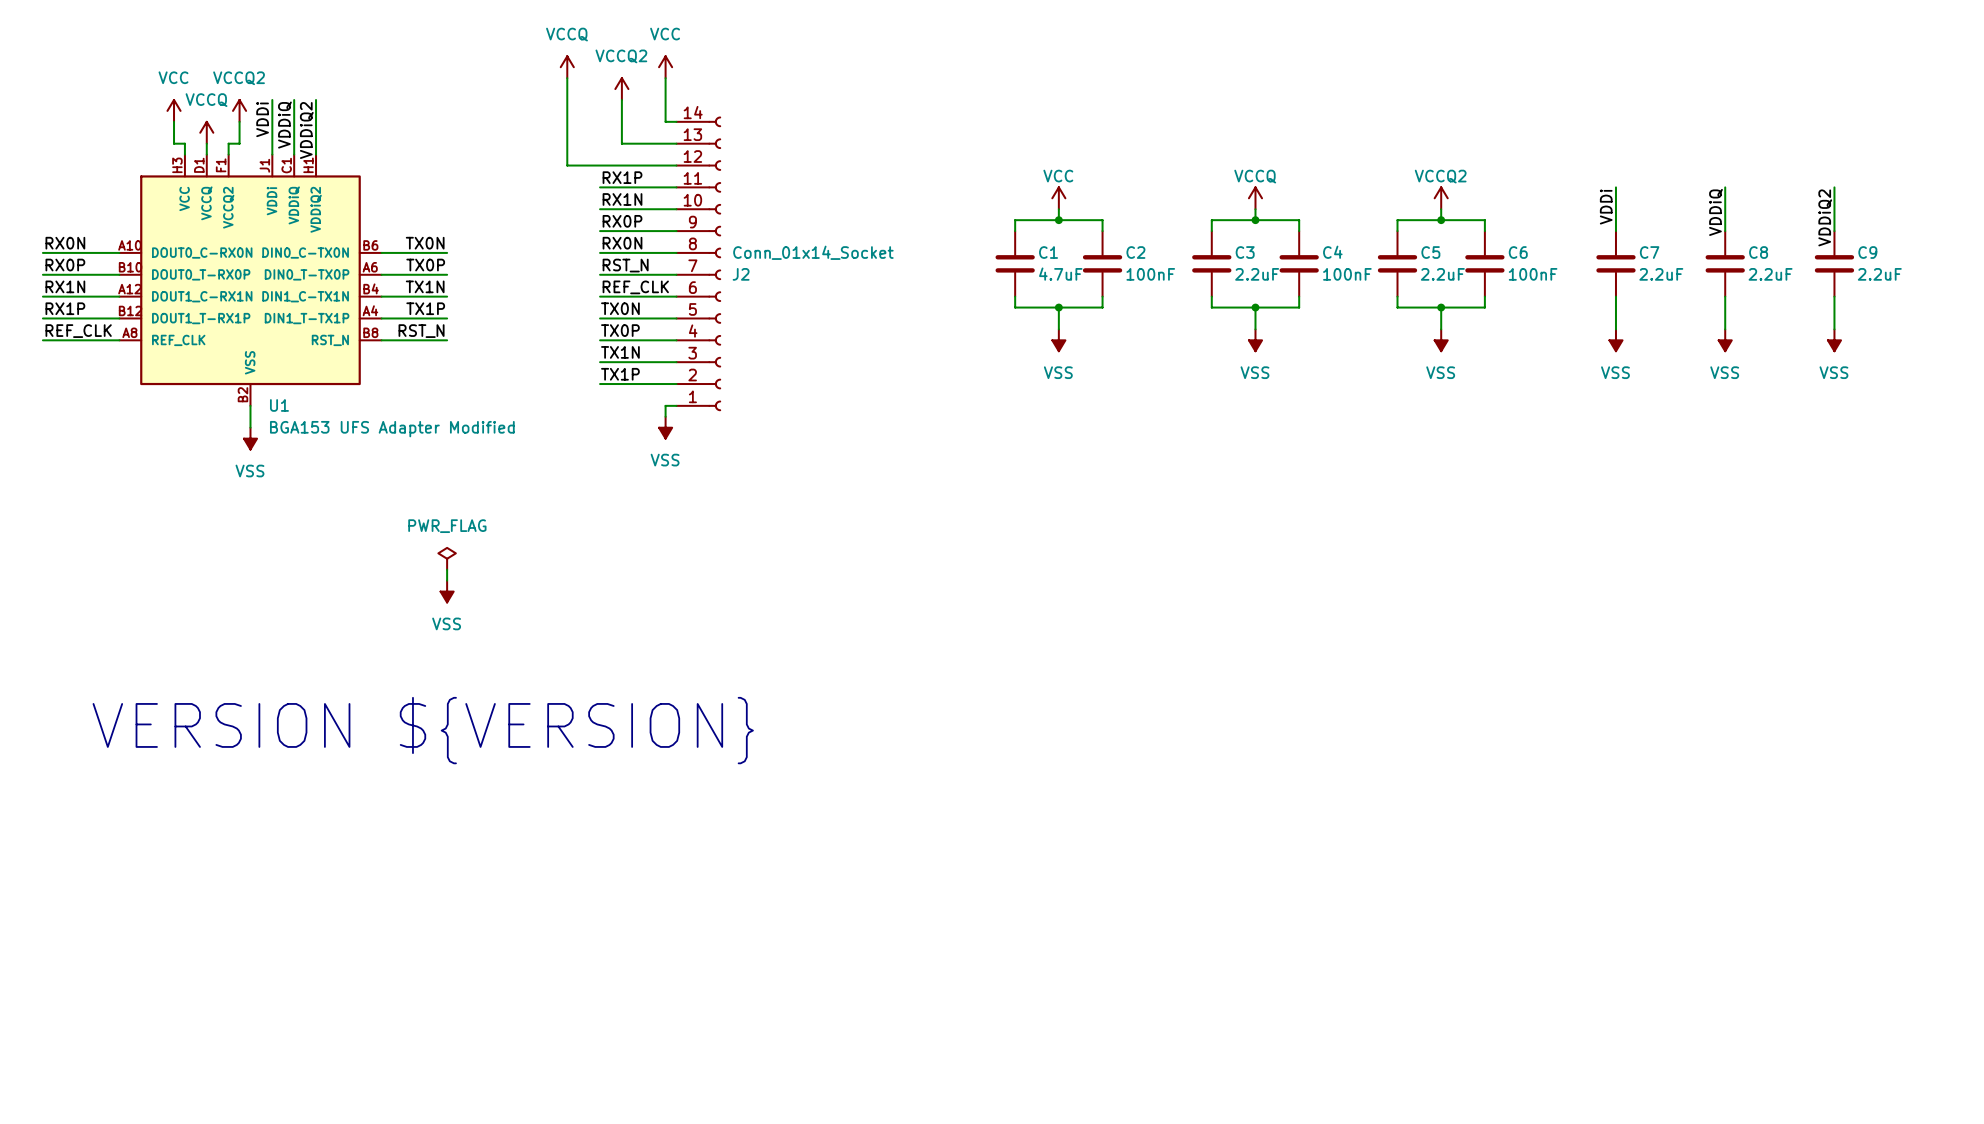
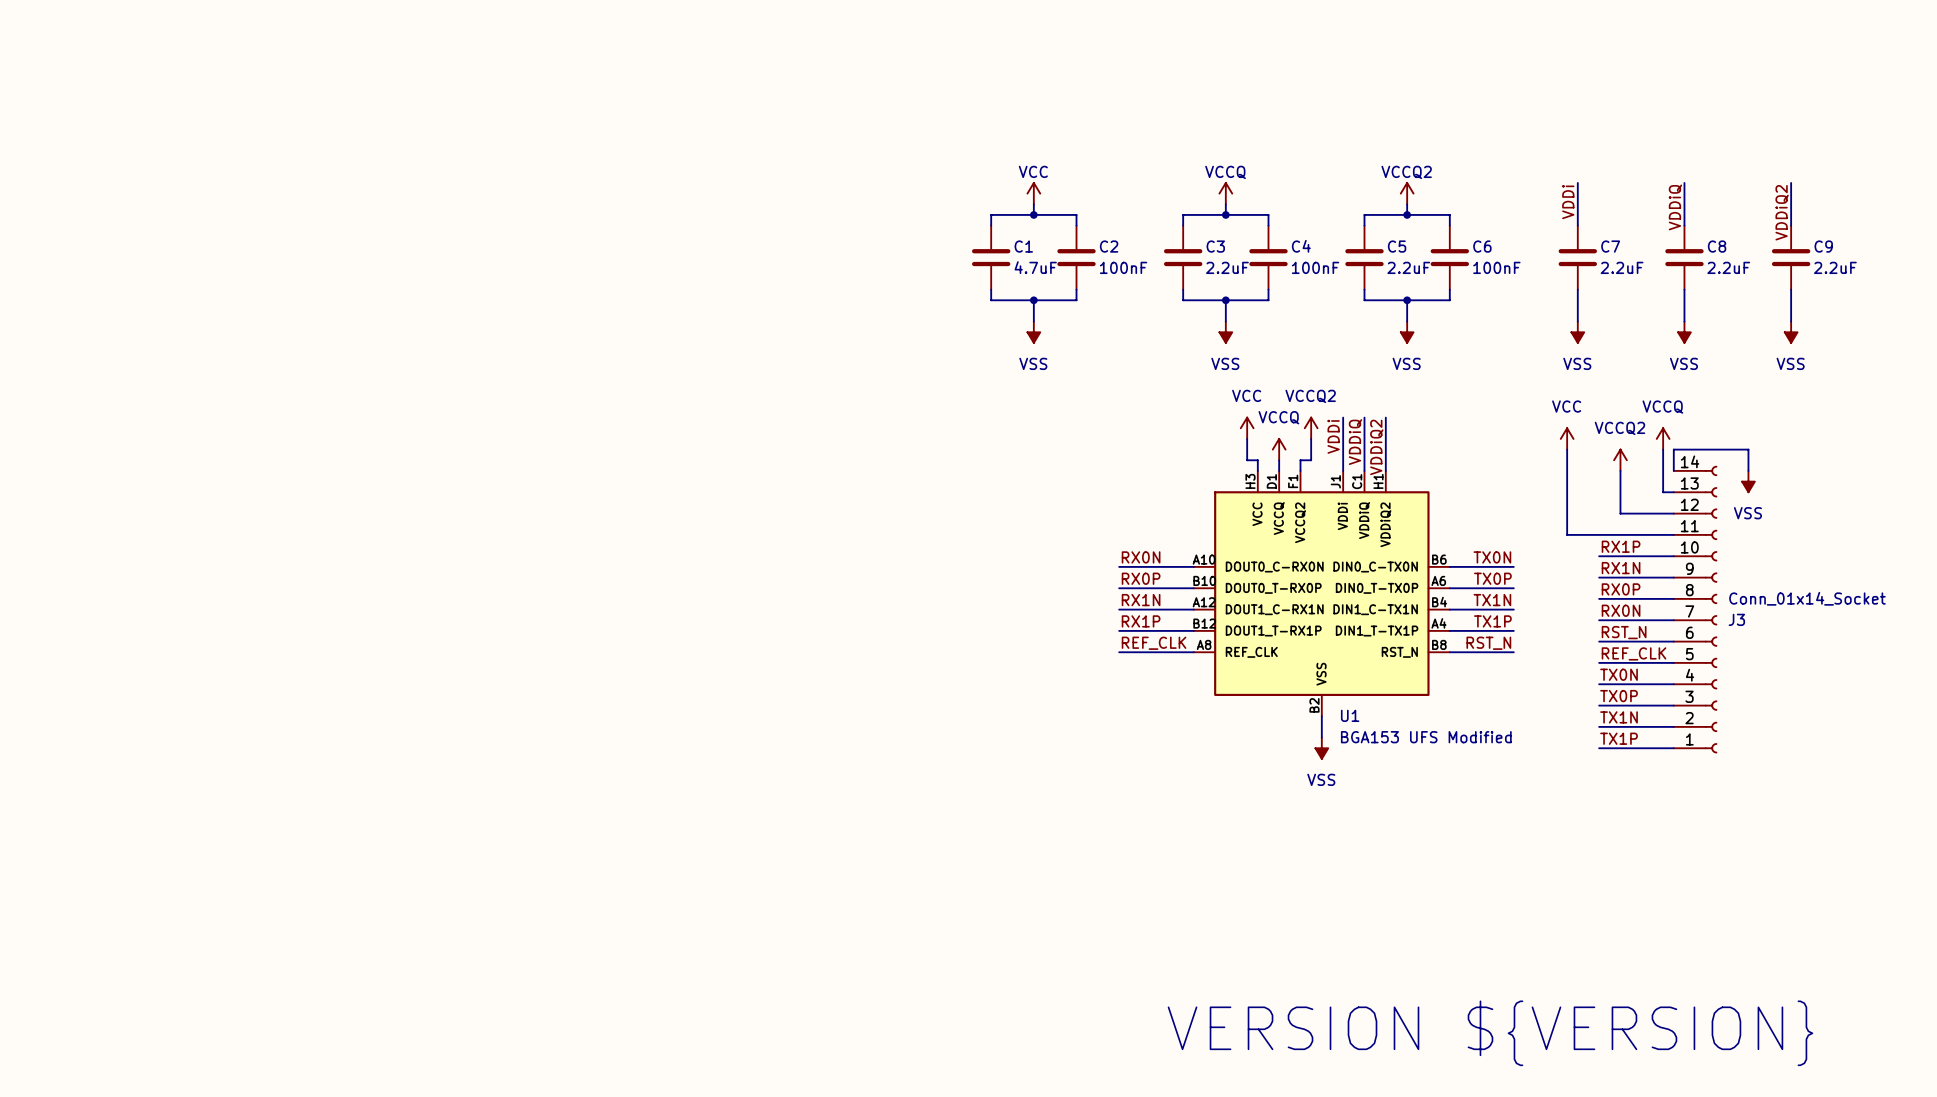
power symbol: VCCQ (567, 67) -> none
power symbol: VCC (665, 67) -> none
wire: (567, 78) (567, 165) (676, 165) -> none
wire: (665, 78) (665, 121) (676, 121) -> none
power symbol: VCCQ2 (621, 89) -> none
wire: (272, 99) (272, 154) -> none
wire: (294, 99) (294, 154) -> none
wire: (316, 99) (316, 154) -> none
wire: (621, 99) (621, 143) (676, 143) -> none
power symbol: VCC (174, 110) -> none
power symbol: VCCQ2 (239, 110) -> none
label: VDDi (262, 119) -> none
wire: (174, 121) (174, 143) (184, 143) (184, 154) -> none
wire: (239, 121) (239, 143) (228, 143) (228, 154) -> none
label: VDDiQ (284, 125) -> none
label: VDDiQ2 (306, 130) -> none
power symbol: VCCQ (206, 132) -> none
wire: (206, 143) (206, 154) -> none
label: RX1P (622, 177) -> none
wire: (600, 187) (676, 187) -> none
label: RX1N (622, 199) -> none
wire: (600, 209) (676, 209) -> none
label: RX0P (622, 221) -> none
wire: (600, 231) (676, 231) -> none
label: RX0N (65, 243) -> none
label: TX0N (425, 243) -> none
label: RX0N (622, 243) -> none
wire: (42, 252) (119, 252) -> none
wire: (381, 252) (447, 252) -> none
wire: (600, 252) (676, 252) -> none
J2: Conn_01x14_Socket (698, 263) -> none
label: RX0P (65, 265) -> none
label: TX0P (425, 265) -> none
label: RST_N (625, 265) -> none
wire: (42, 274) (119, 274) -> none
wire: (381, 274) (447, 274) -> none
wire: (600, 274) (676, 274) -> none
U1 position: (250, 280) -> (1321, 593)
label: RX1N (65, 286) -> none
label: TX1N (425, 286) -> none
label: REF_CLK (635, 287) -> none
wire: (42, 296) (119, 296) -> none
wire: (381, 296) (447, 296) -> none
wire: (600, 296) (676, 296) -> none
label: RX1P (65, 308) -> none
label: TX1P (425, 308) -> none
label: TX0N (620, 308) -> none
wire: (42, 318) (119, 318) -> none
wire: (381, 318) (447, 318) -> none
wire: (600, 318) (676, 318) -> none
label: TX0P (620, 330) -> none
label: REF_CLK (78, 331) -> none
label: RST_N (421, 331) -> none
wire: (42, 340) (119, 340) -> none
wire: (381, 340) (447, 340) -> none
wire: (600, 340) (676, 340) -> none
label: TX1N (620, 352) -> none
wire: (600, 362) (676, 362) -> none
label: TX1P (620, 374) -> none
wire: (600, 384) (676, 384) -> none
wire: (250, 405) (250, 427) -> none
wire: (676, 405) (665, 405) (665, 416) -> none
power symbol: VSS (665, 427) -> none
wire: none -> (1343, 417) (1343, 470)
wire: none -> (1364, 417) (1364, 470)
wire: none -> (1385, 417) (1385, 470)
U1 value: BGA153 UFS Adapter Modified (392, 429) -> BGA153 UFS Modified (1426, 737)
power symbol: VSS (250, 438) -> none
power symbol: none -> VCC (1247, 428)
power symbol: none -> VCCQ2 (1311, 428)
label: none -> VDDi (1333, 436)
wire: none -> (1247, 438) (1247, 460) (1257, 460) (1257, 470)
wire: none -> (1311, 438) (1311, 460) (1300, 460) (1300, 470)
power symbol: none -> VCC (1567, 438)
power symbol: none -> VCCQ (1663, 438)
label: none -> VDDiQ (1355, 442)
label: none -> VDDiQ2 (1376, 447)
power symbol: none -> VCCQ (1279, 449)
wire: none -> (1567, 449) (1567, 534) (1673, 534)
wire: none -> (1663, 449) (1663, 492) (1673, 492)
wire: none -> (1279, 460) (1279, 470)
power symbol: none -> VCCQ2 (1620, 460)
wire: none -> (1620, 470) (1620, 513) (1673, 513)
wire: none -> (1673, 470) (1673, 449) (1748, 449) (1748, 470)
power symbol: none -> VSS (1748, 481)
power symbol: PWR_FLAG (447, 558) -> none
label: none -> RX1P (1621, 546)
wire: (447, 569) (447, 580) -> none
wire: none -> (1599, 556) (1673, 556)
label: none -> RX0N (1141, 557)
label: none -> TX0N (1492, 557)
wire: none -> (1119, 566) (1193, 566)
wire: none -> (1449, 566) (1513, 566)
label: none -> RX1N (1621, 568)
power symbol: VSS (447, 591) -> none
wire: none -> (1599, 577) (1673, 577)
label: none -> RX0P (1141, 578)
label: none -> TX0P (1492, 578)
wire: none -> (1119, 588) (1193, 588)
wire: none -> (1449, 588) (1513, 588)
label: none -> RX0P (1621, 589)
wire: none -> (1599, 598) (1673, 598)
label: none -> RX1N (1141, 600)
label: none -> TX1N (1492, 600)
wire: none -> (1119, 609) (1193, 609)
wire: none -> (1449, 609) (1513, 609)
J3: none -> Conn_01x14_Socket (1695, 609)
label: none -> RX0N (1621, 610)
wire: none -> (1599, 620) (1673, 620)
label: none -> RX1P (1141, 621)
label: none -> TX1P (1492, 621)
wire: none -> (1119, 630) (1193, 630)
wire: none -> (1449, 630) (1513, 630)
label: none -> RST_N (1624, 632)
wire: none -> (1599, 641) (1673, 641)
label: none -> REF_CLK (1154, 643)
label: none -> RST_N (1488, 643)
wire: none -> (1119, 652) (1193, 652)
wire: none -> (1449, 652) (1513, 652)
label: none -> REF_CLK (1634, 653)
wire: none -> (1599, 662) (1673, 662)
label: none -> TX0N (1619, 674)
wire: none -> (1599, 684) (1673, 684)
label: none -> TX0P (1619, 696)
wire: none -> (1599, 705) (1673, 705)
text: VERSION ${VERSION} (423, 730) -> none
wire: none -> (1321, 716) (1321, 737)
label: none -> TX1N (1619, 717)
wire: none -> (1599, 726) (1673, 726)
label: none -> TX1P (1619, 738)
power symbol: none -> VSS (1321, 748)
wire: none -> (1599, 748) (1673, 748)
text: none -> VERSION ${VERSION} (1490, 1033)

